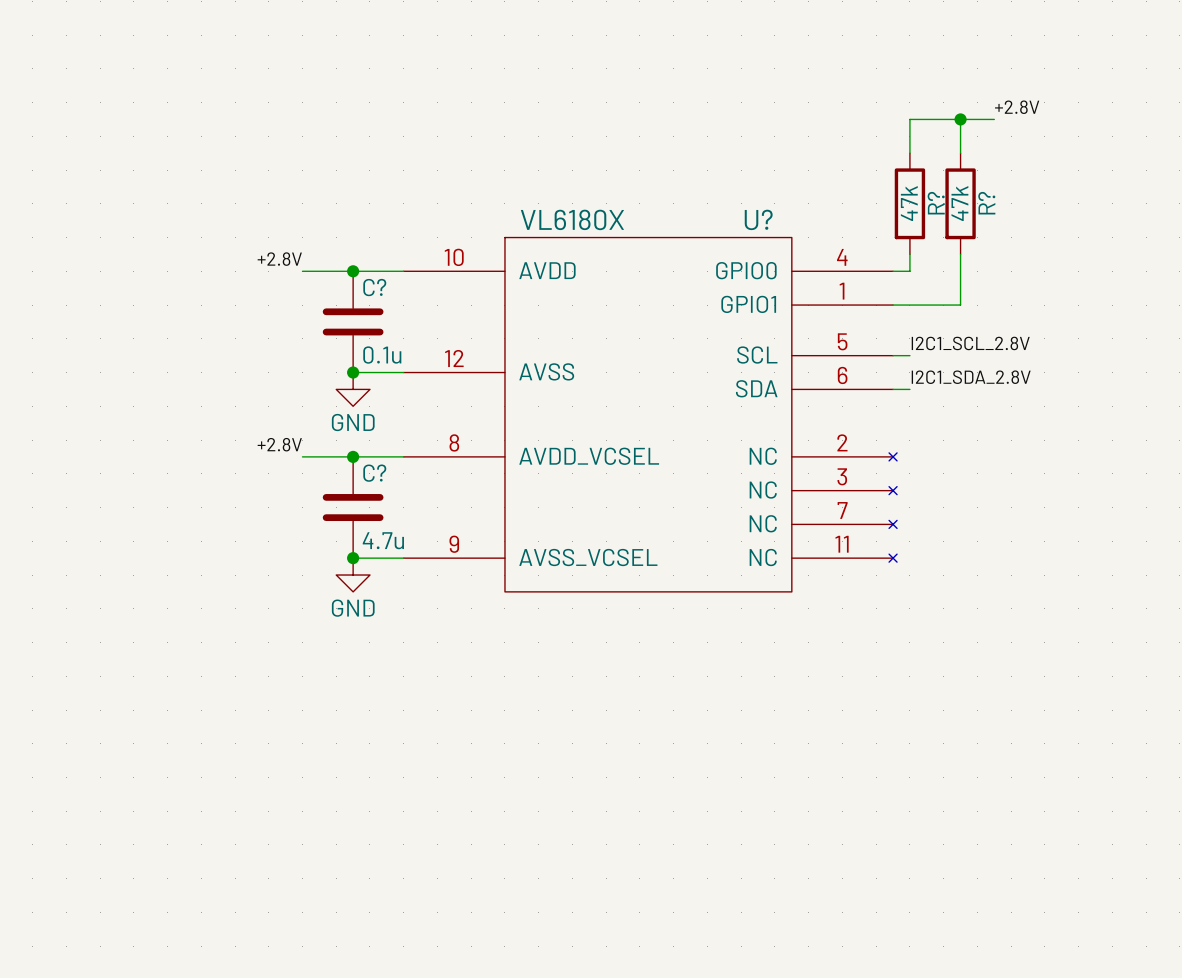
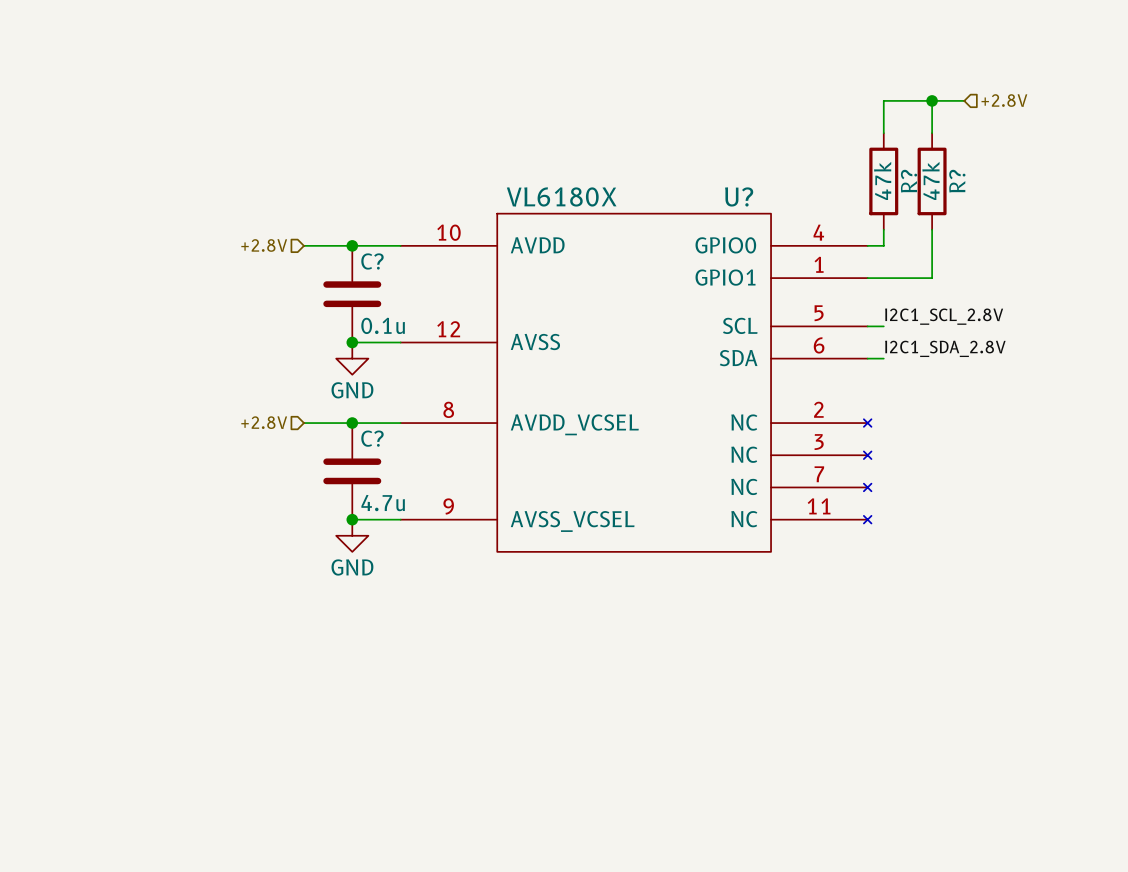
label: +2.8V (1017, 107) -> none
hierarchical label: none -> +2.8V (1004, 100)
label: +2.8V (279, 259) -> none
hierarchical label: none -> +2.8V (264, 245)
label: +2.8V (279, 444) -> none
hierarchical label: none -> +2.8V (264, 422)

